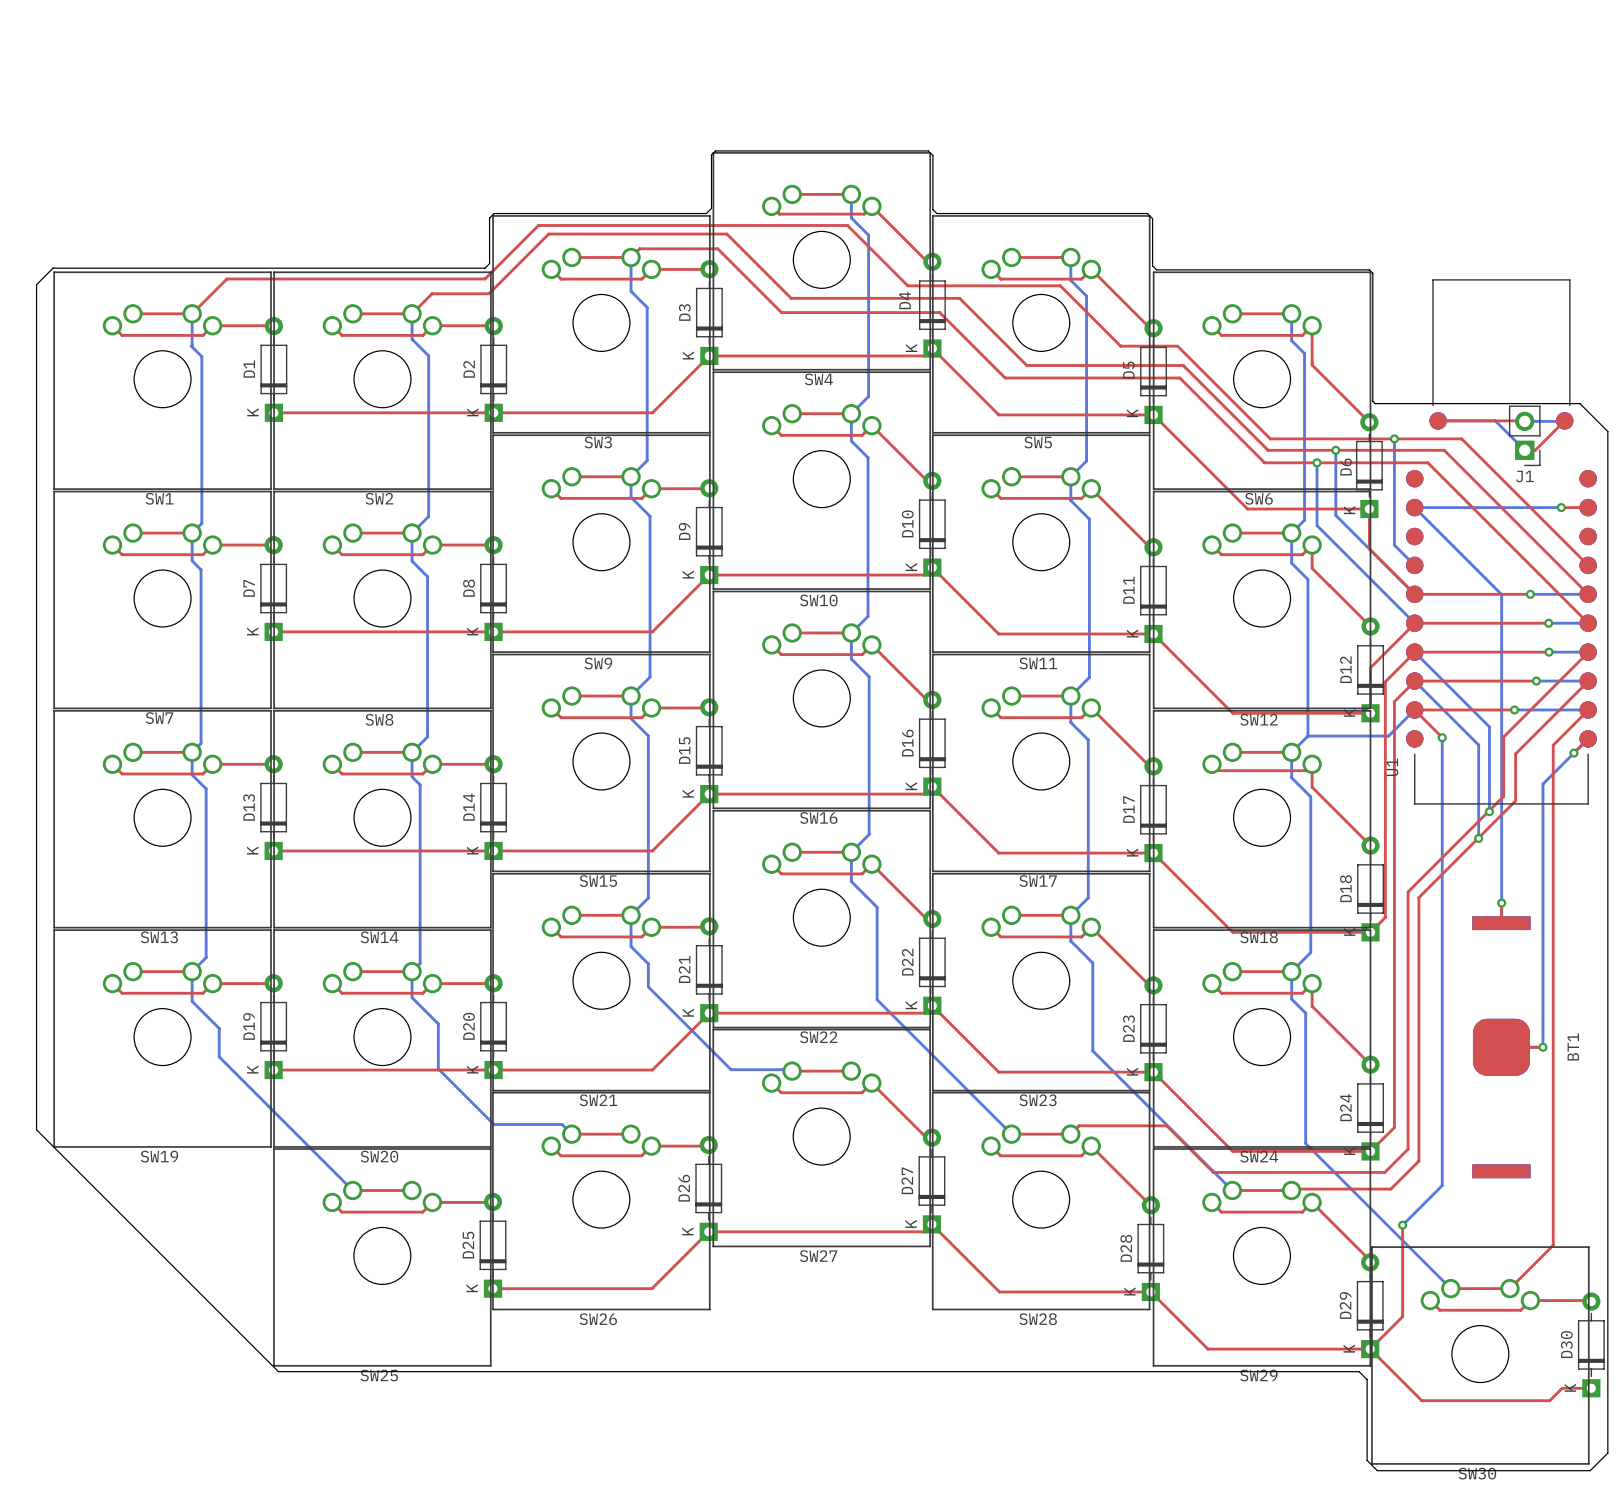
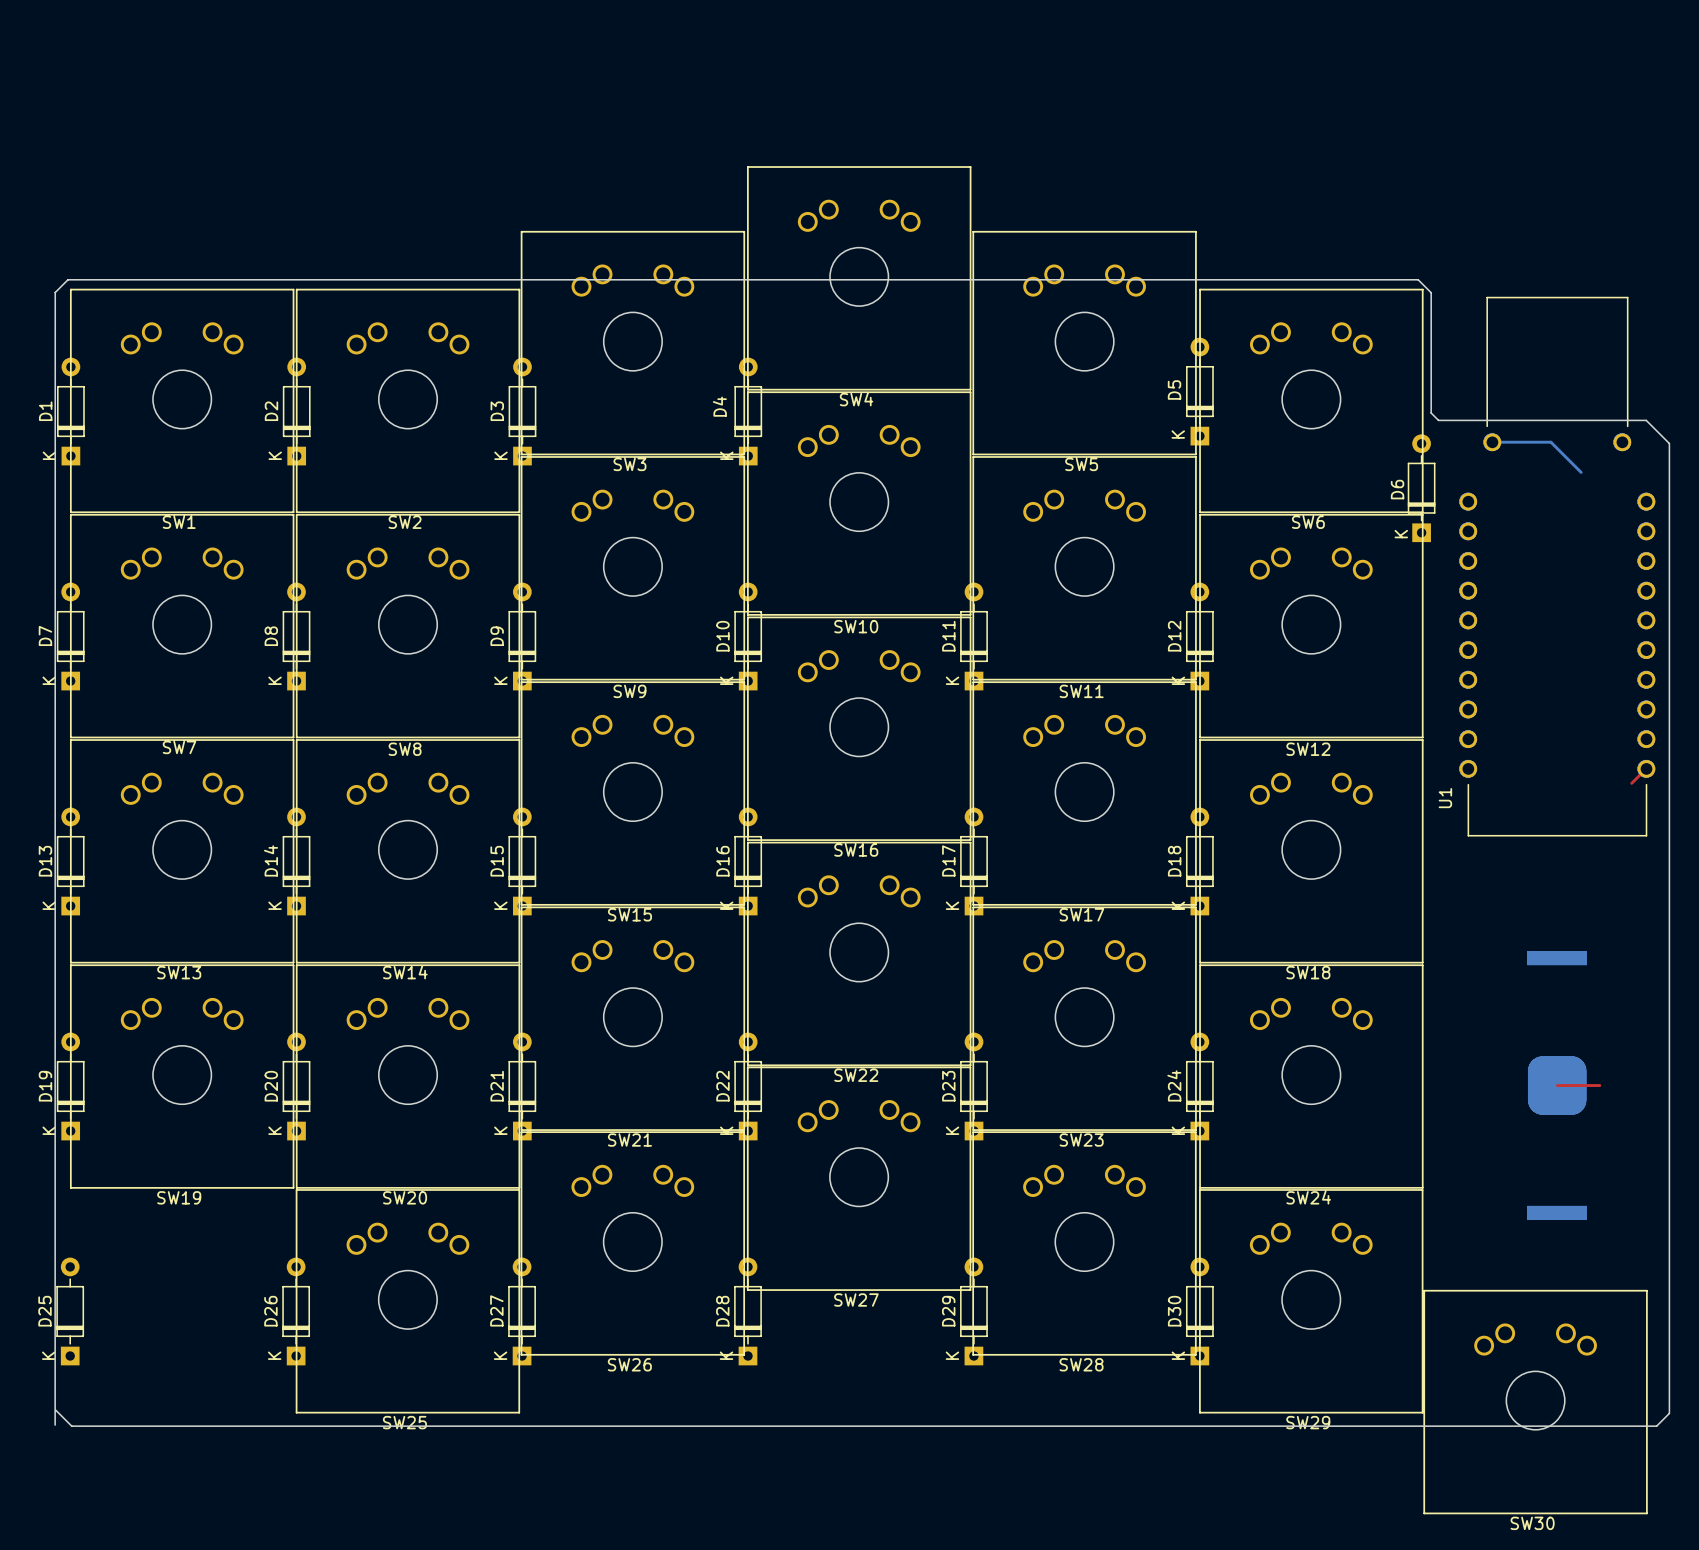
board edge: (715, 150) (928, 150) (932, 155) (932, 209) (936, 213) (1147, 213) (1152, 218) (1152, 265) (1156, 269) (1369, 269) (1372, 273) (1372, 401) (1375, 403) (1579, 403) (1607, 431) (1607, 1453) (1590, 1470) (1377, 1470) (1367, 1460) (1367, 1379) (1359, 1371) (278, 1371) (36, 1129) (36, 284) (53, 268) (485, 268) (489, 263) (489, 218) (494, 213) (706, 213) (711, 208) (711, 154) (715, 150) -> none
top track: (792, 194) (851, 194) -> none
bottom track: (851, 194) (851, 217) (868, 235) (868, 396) (851, 413) (851, 441) (868, 457) (868, 616) (851, 632) (851, 659) (869, 676) (869, 834) (851, 852) (851, 881) (877, 907) (877, 999) (1011, 1134) -> none
top track: (771, 206) (779, 214) (864, 214) (871, 206) (927, 261) (932, 261) -> none
top track: (571, 257) (631, 257) (639, 248) (717, 248) (781, 312) (939, 312) (1005, 378) (1179, 378) (1264, 462) (1427, 462) (1588, 623) -> none
bottom track: (631, 257) (631, 291) (647, 307) (647, 460) (631, 476) (631, 497) (650, 516) (650, 677) (631, 696) (631, 718) (648, 735) (648, 898) (631, 915) (631, 946) (648, 963) (648, 986) (731, 1069) (792, 1071) -> none
top track: (1011, 257) (1070, 257) -> none
bottom track: (1070, 257) (1070, 280) (1086, 296) (1086, 461) (1070, 476) (1070, 500) (1089, 519) (1089, 677) (1070, 696) (1070, 722) (1088, 739) (1088, 897) (1070, 915) (1070, 941) (1092, 963) (1092, 1050) (1232, 1190) -> none
top track: (709, 269) (651, 269) (641, 279) (561, 279) (551, 269) -> none
top track: (991, 269) (1000, 279) (1081, 279) (1091, 269) (1150, 328) (1153, 328) -> none
U1 footprint: [1406, 279, 1597, 805] -> [1459, 296, 1656, 837]
D4 position: (932, 305) -> (748, 411)
D3 position: (709, 312) -> (522, 411)
top track: (132, 313) (192, 313) (226, 278) (485, 278) (538, 225) (847, 225) (907, 285) (1060, 285) (1120, 346) (1177, 346) (1270, 438) (1461, 438) (1588, 565) -> none
bottom track: (192, 313) (191, 346) (201, 356) (201, 523) (192, 533) (192, 560) (201, 569) (201, 743) (192, 752) (192, 774) (206, 788) (206, 957) (192, 971) (192, 1001) (219, 1028) (219, 1056) (352, 1190) -> none
top track: (352, 313) (412, 313) (432, 293) (489, 293) (548, 234) (726, 234) (791, 298) (959, 298) (1026, 365) (1183, 365) (1268, 450) (1444, 450) (1588, 594) -> none
bottom track: (412, 313) (412, 339) (428, 355) (428, 516) (412, 533) (412, 561) (427, 576) (427, 736) (412, 752) (412, 776) (420, 784) (420, 963) (412, 971) (412, 997) (438, 1023) (438, 1068) (493, 1124) (562, 1124) (571, 1134) -> none
top track: (1232, 313) (1291, 313) -> none
bottom track: (1291, 313) (1291, 340) (1304, 353) (1304, 520) (1291, 533) (1291, 563) (1307, 579) (1307, 736) -> none
top track: (112, 325) (122, 335) (202, 335) (212, 325) (273, 326) -> none
top track: (332, 325) (342, 335) (422, 335) (432, 325) (493, 326) -> none
top track: (1211, 325) (1221, 335) (1302, 335) (1312, 325) (1312, 365) (1369, 422) -> none
D1 position: (273, 369) -> (70, 411)
D2 position: (493, 369) -> (296, 411)
top track: (273, 412) (652, 412) (709, 355) (924, 355) (932, 348) (998, 414) (1153, 414) (1247, 509) (1369, 509) (1369, 548) (1414, 594) -> none
top track: (792, 413) (851, 413) -> none
top track: (1438, 420) (1524, 421) -> none
top track: (1564, 420) (1535, 450) (1524, 450) -> none
bottom track: (1564, 420) (1524, 421) -> none
top track: (771, 425) (781, 435) (862, 435) (871, 425) (927, 480) (932, 480) -> none
J1: (1524, 435) -> none
bottom track: (1394, 438) (1394, 545) (1414, 565) -> none
via: (1394, 438) -> none
bottom track: (1335, 450) (1335, 515) (1414, 594) -> none
via: (1335, 450) -> none
bottom track: (1317, 462) (1317, 525) (1414, 623) -> none
via: (1317, 462) -> none
top track: (571, 476) (631, 476) -> none
top track: (1011, 476) (1070, 476) -> none
top track: (709, 488) (651, 488) (641, 498) (561, 498) (551, 488) -> none
top track: (991, 488) (1000, 498) (1081, 498) (1091, 488) (1149, 547) (1153, 547) -> none
top track: (1561, 507) (1588, 507) -> none
bottom track: (1561, 507) (1414, 507) (1501, 594) (1501, 923) -> none
via: (1561, 507) -> none
D10 position: (932, 524) -> (748, 636)
D9 position: (709, 531) -> (522, 636)
top track: (132, 533) (192, 533) -> none
top track: (352, 533) (412, 533) -> none
top track: (1232, 533) (1291, 533) -> none
top track: (112, 545) (122, 554) (202, 554) (212, 545) (273, 545) -> none
top track: (332, 545) (342, 554) (422, 554) (432, 545) (493, 545) -> none
top track: (1211, 545) (1221, 554) (1302, 554) (1312, 545) (1312, 568) (1329, 585) -> none
top track: (1329, 585) (1370, 626) -> none
D7 position: (273, 588) -> (70, 636)
D8 position: (493, 588) -> (296, 636)
D11 position: (1153, 590) -> (974, 636)
top track: (1414, 594) (1530, 594) -> none
bottom track: (1530, 594) (1588, 594) -> none
via: (1530, 594) -> none
top track: (1414, 623) (1548, 623) -> none
top track: (1414, 623) (1370, 667) (1370, 713) (1232, 713) (1153, 633) (998, 633) (932, 567) (924, 575) (709, 575) (652, 631) (273, 631) -> none
bottom track: (1548, 623) (1588, 623) -> none
via: (1548, 623) -> none
top track: (792, 632) (851, 632) -> none
top track: (771, 644) (781, 654) (862, 654) (871, 644) (926, 699) (932, 699) -> none
top track: (1414, 652) (1549, 652) -> none
top track: (1414, 652) (1385, 681) (1385, 917) (1370, 932) (1232, 932) (1153, 853) (998, 853) (932, 786) (924, 794) (709, 794) (652, 850) (273, 850) -> none
bottom track: (1414, 652) (1489, 726) (1489, 811) -> none
bottom track: (1549, 652) (1588, 652) -> none
via: (1549, 652) -> none
top track: (1588, 652) (1503, 736) (1503, 796) (1408, 891) (1408, 1149) (1384, 1172) (1213, 1172) (1166, 1125) (1079, 1125) (1070, 1134) (1011, 1134) -> none
D12 position: (1370, 669) -> (1199, 636)
top track: (1414, 681) (1536, 681) -> none
top track: (1414, 681) (1394, 701) (1394, 1127) (1370, 1151) (1232, 1151) (1153, 1072) (998, 1072) (932, 1005) (924, 1013) (709, 1013) (652, 1070) (273, 1070) -> none
bottom track: (1414, 681) (1478, 745) (1478, 838) -> none
bottom track: (1536, 681) (1588, 681) -> none
via: (1536, 681) -> none
top track: (1588, 681) (1515, 753) (1515, 800) (1418, 897) (1418, 1161) (1390, 1189) (1232, 1190) -> none
top track: (571, 696) (631, 696) -> none
top track: (1011, 696) (1070, 696) -> none
top track: (709, 707) (651, 707) (641, 717) (561, 717) (551, 707) -> none
top track: (991, 707) (1000, 717) (1081, 717) (1091, 707) (1149, 766) (1153, 766) -> none
bottom track: (1414, 709) (1388, 736) (1307, 736) -> none
top track: (1512, 709) (1414, 709) (1442, 737) -> none
bottom track: (1514, 709) (1588, 709) -> none
via: (1514, 709) -> none
top track: (1588, 710) (1553, 745) (1553, 1245) (1509, 1288) (1450, 1288) -> none
bottom track: (1307, 736) (1291, 752) (1291, 777) (1310, 796) (1310, 952) (1291, 971) (1291, 999) (1305, 1013) (1305, 1143) (1450, 1288) -> none
bottom track: (1442, 737) (1442, 1185) (1402, 1225) -> none
via: (1442, 737) -> none
bottom track: (1588, 738) (1542, 784) (1542, 1047) (1501, 1047) -> none
D16 position: (932, 743) -> (748, 861)
D15 position: (709, 750) -> (522, 861)
top track: (132, 752) (192, 752) -> none
top track: (352, 752) (412, 752) -> none
top track: (1232, 752) (1291, 752) -> none
via: (1573, 753) -> none
top track: (112, 764) (122, 773) (202, 773) (212, 764) (273, 764) -> none
top track: (332, 764) (342, 773) (422, 773) (432, 764) (493, 764) -> none
top track: (1211, 764) (1218, 770) (1305, 770) (1312, 764) (1312, 787) (1370, 845) -> none
D13 position: (273, 807) -> (70, 861)
D14 position: (493, 807) -> (296, 861)
D17 position: (1153, 809) -> (974, 861)
via: (1489, 811) -> none
via: (1478, 838) -> none
top track: (792, 852) (851, 852) -> none
top track: (771, 864) (781, 873) (862, 873) (871, 864) (926, 919) (932, 919) -> none
D18 position: (1370, 888) -> (1199, 861)
top track: (1501, 903) (1501, 923) -> none
via: (1501, 903) -> none
top track: (571, 915) (631, 915) -> none
top track: (1011, 915) (1070, 915) -> none
top track: (709, 926) (651, 927) (641, 936) (561, 936) (551, 927) -> none
top track: (991, 927) (1000, 936) (1081, 936) (1091, 927) (1149, 985) (1153, 985) -> none
D22 position: (932, 962) -> (748, 1086)
D21 position: (709, 969) -> (522, 1086)
top track: (132, 971) (192, 971) -> none
top track: (352, 971) (412, 971) -> none
top track: (1232, 971) (1291, 971) -> none
top track: (273, 983) (212, 983) (202, 993) (122, 993) (112, 983) -> none
top track: (493, 983) (432, 983) (422, 993) (342, 993) (332, 983) -> none
top track: (1211, 983) (1221, 993) (1302, 993) (1312, 983) (1312, 1006) (1370, 1064) -> none
D19 position: (273, 1026) -> (70, 1086)
D20 position: (493, 1026) -> (296, 1086)
D23 position: (1153, 1028) -> (974, 1086)
BT1: (1501, 1047) -> none
via: (1542, 1047) -> none
top track: (792, 1071) (851, 1071) -> none
top track: (771, 1083) (781, 1092) (862, 1092) (871, 1083) (926, 1137) (931, 1137) -> none
D24 position: (1370, 1108) -> (1199, 1086)
top track: (571, 1134) (630, 1134) -> none
top track: (708, 1145) (651, 1146) (641, 1155) (560, 1155) (551, 1146) -> none
top track: (991, 1146) (1000, 1155) (1081, 1155) (1091, 1146) (1150, 1205) -> none
D27 position: (931, 1181) -> (522, 1311)
D26 position: (708, 1188) -> (296, 1311)
top track: (352, 1190) (411, 1190) -> none
top track: (492, 1201) (432, 1202) (422, 1212) (341, 1212) (332, 1202) -> none
top track: (1211, 1202) (1221, 1212) (1302, 1212) (1312, 1202) (1370, 1262) -> none
top track: (1402, 1225) (1402, 1316) (1370, 1349) -> none
via: (1402, 1225) -> none
D25 position: (492, 1245) -> (70, 1311)
D28 position: (1150, 1248) -> (747, 1311)
top track: (492, 1288) (651, 1288) (708, 1231) (924, 1231) (931, 1224) (999, 1291) (1150, 1291) (1207, 1349) (1370, 1349) -> none
top track: (1430, 1300) (1439, 1310) (1520, 1310) (1530, 1300) (1591, 1301) -> none
D29 position: (1370, 1305) -> (973, 1311)
D30 position: (1591, 1344) -> (1199, 1311)
top track: (1370, 1349) (1421, 1400) (1549, 1400) (1562, 1388) (1591, 1388) -> none
board edge: none -> (55, 1410) (71, 1426) (1656, 1426) (1669, 1413) (1669, 443) (1646, 420) (1438, 420) (1431, 413) (1431, 292) (1418, 279) (67, 279) (55, 292) (55, 1425)

